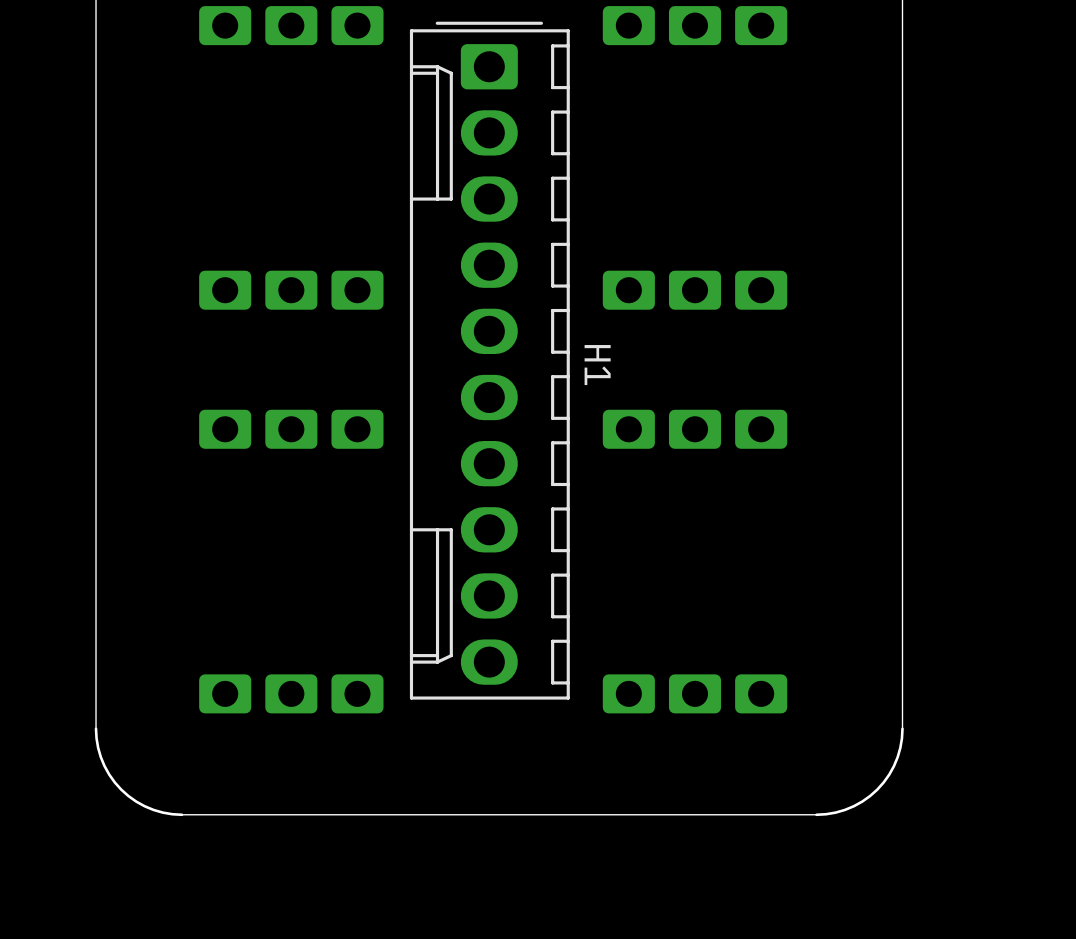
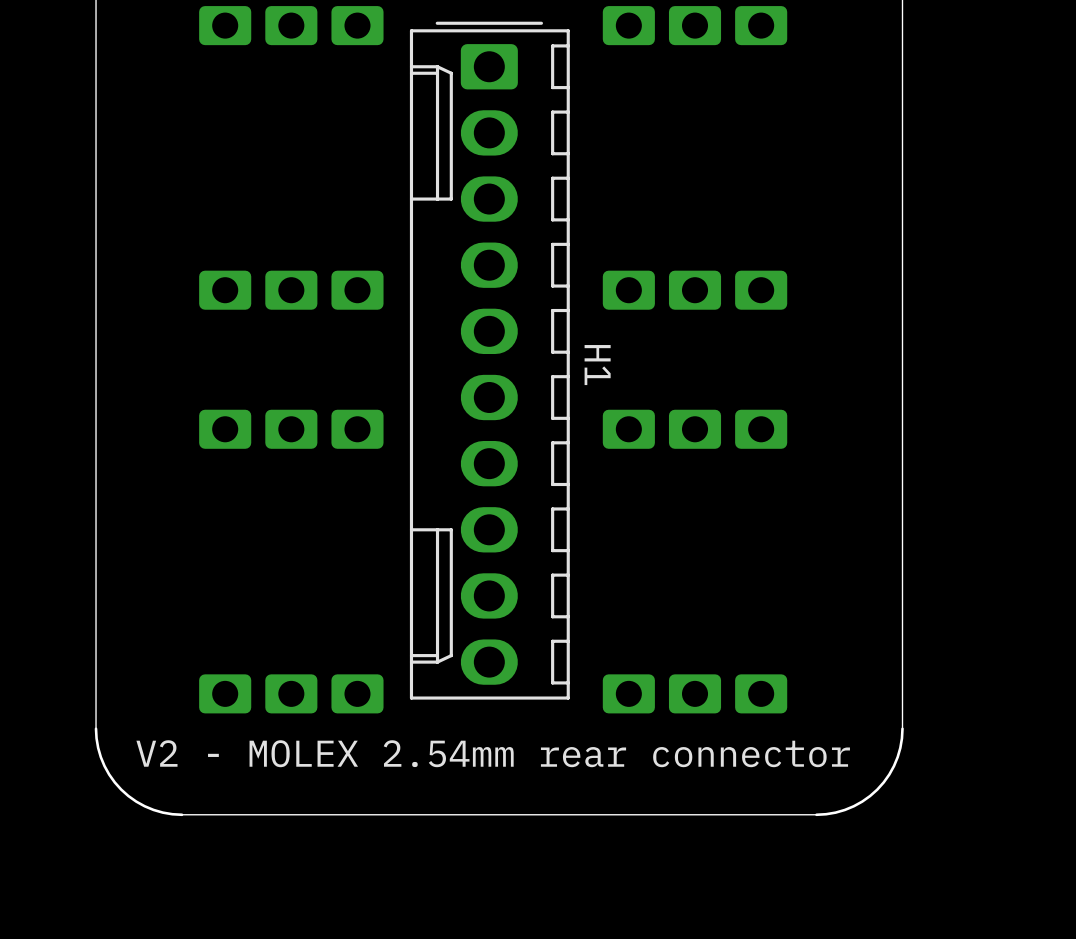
text: none -> V2 - MOLEX 2.54mm rear connector (493, 753)

